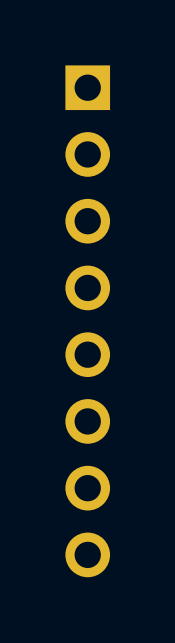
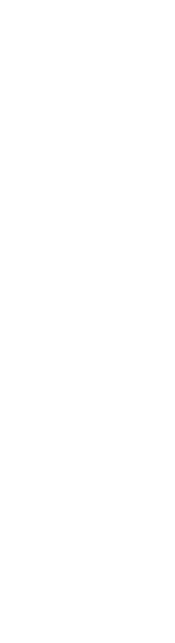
part: (87, 321) -> none

